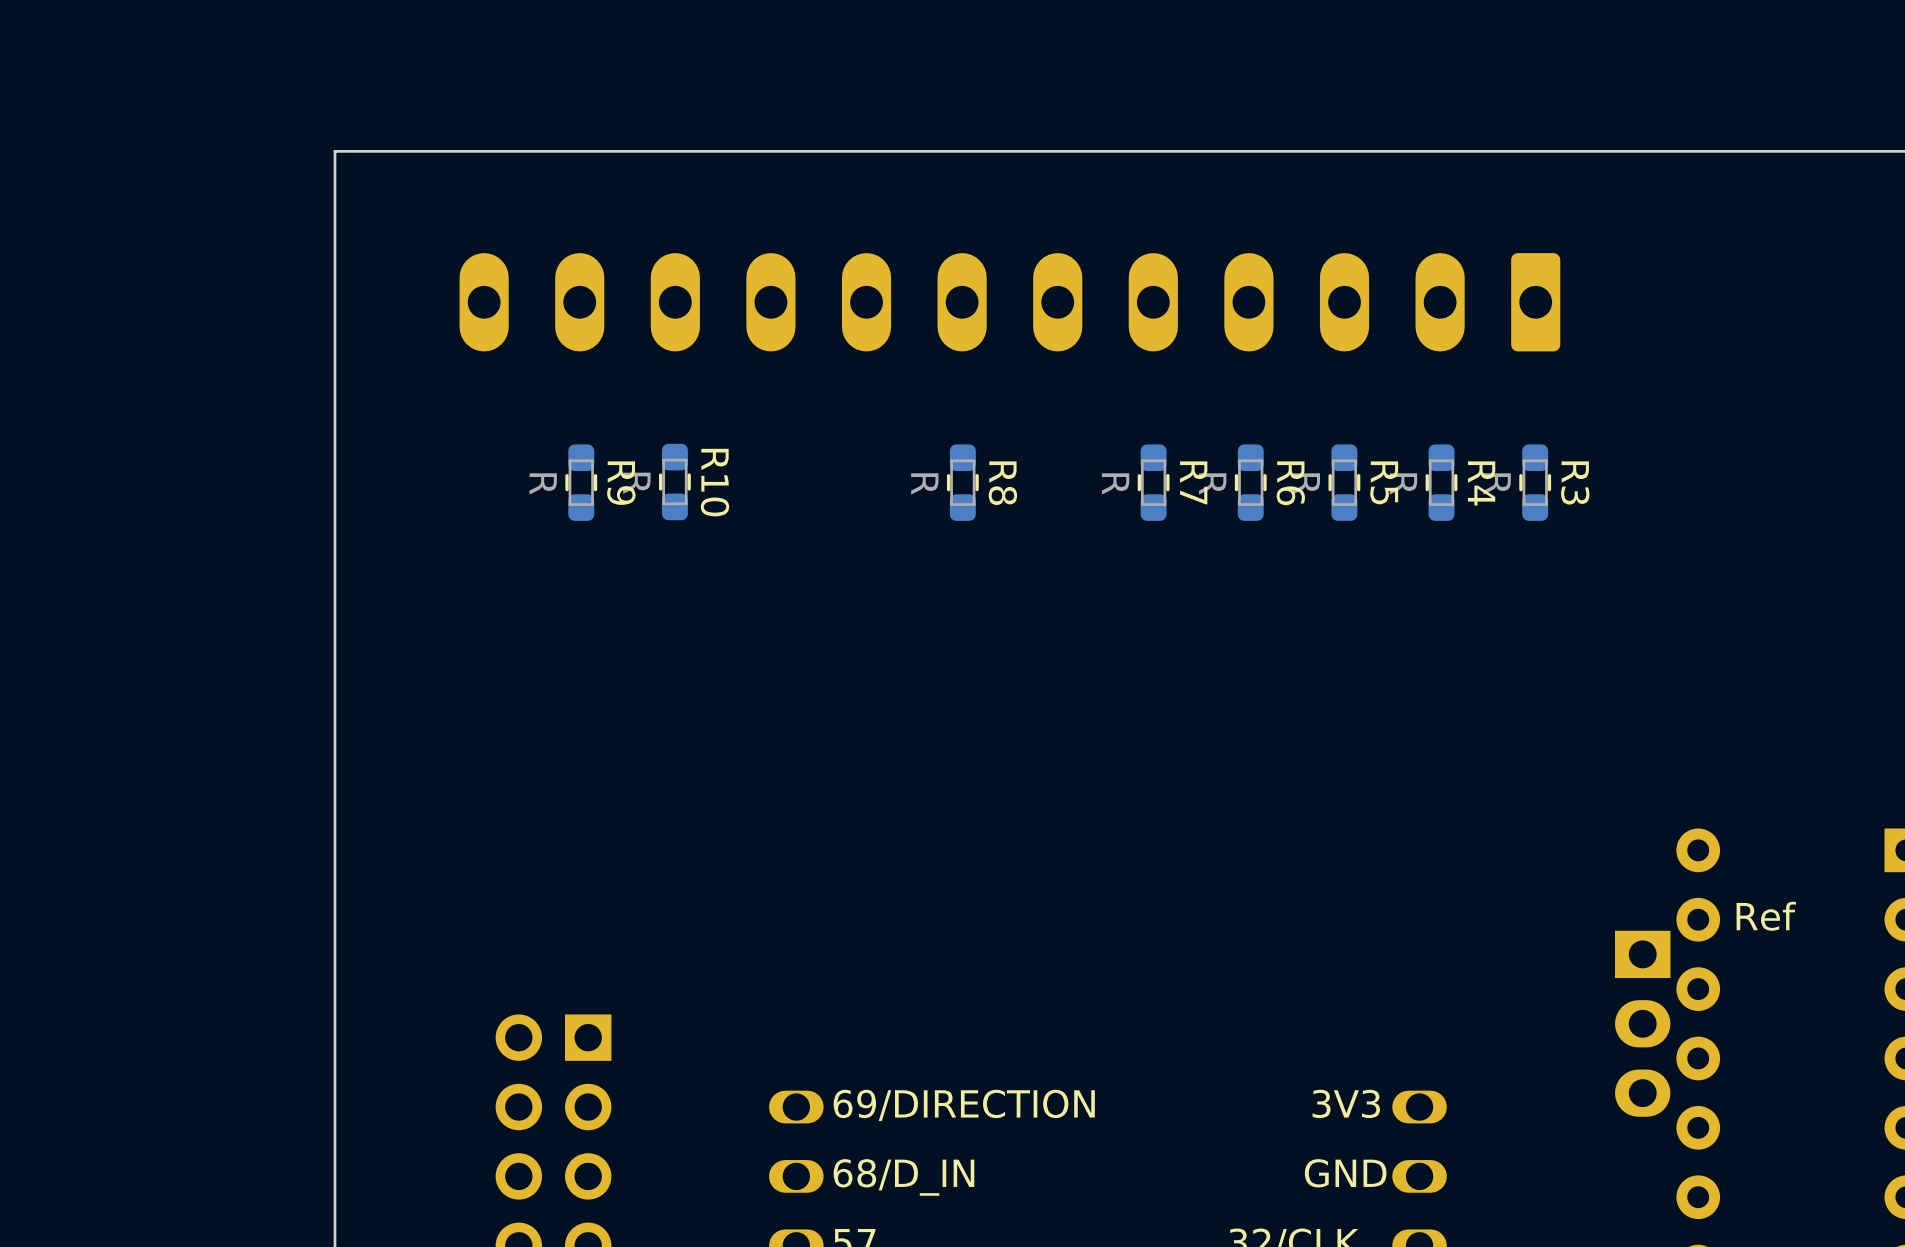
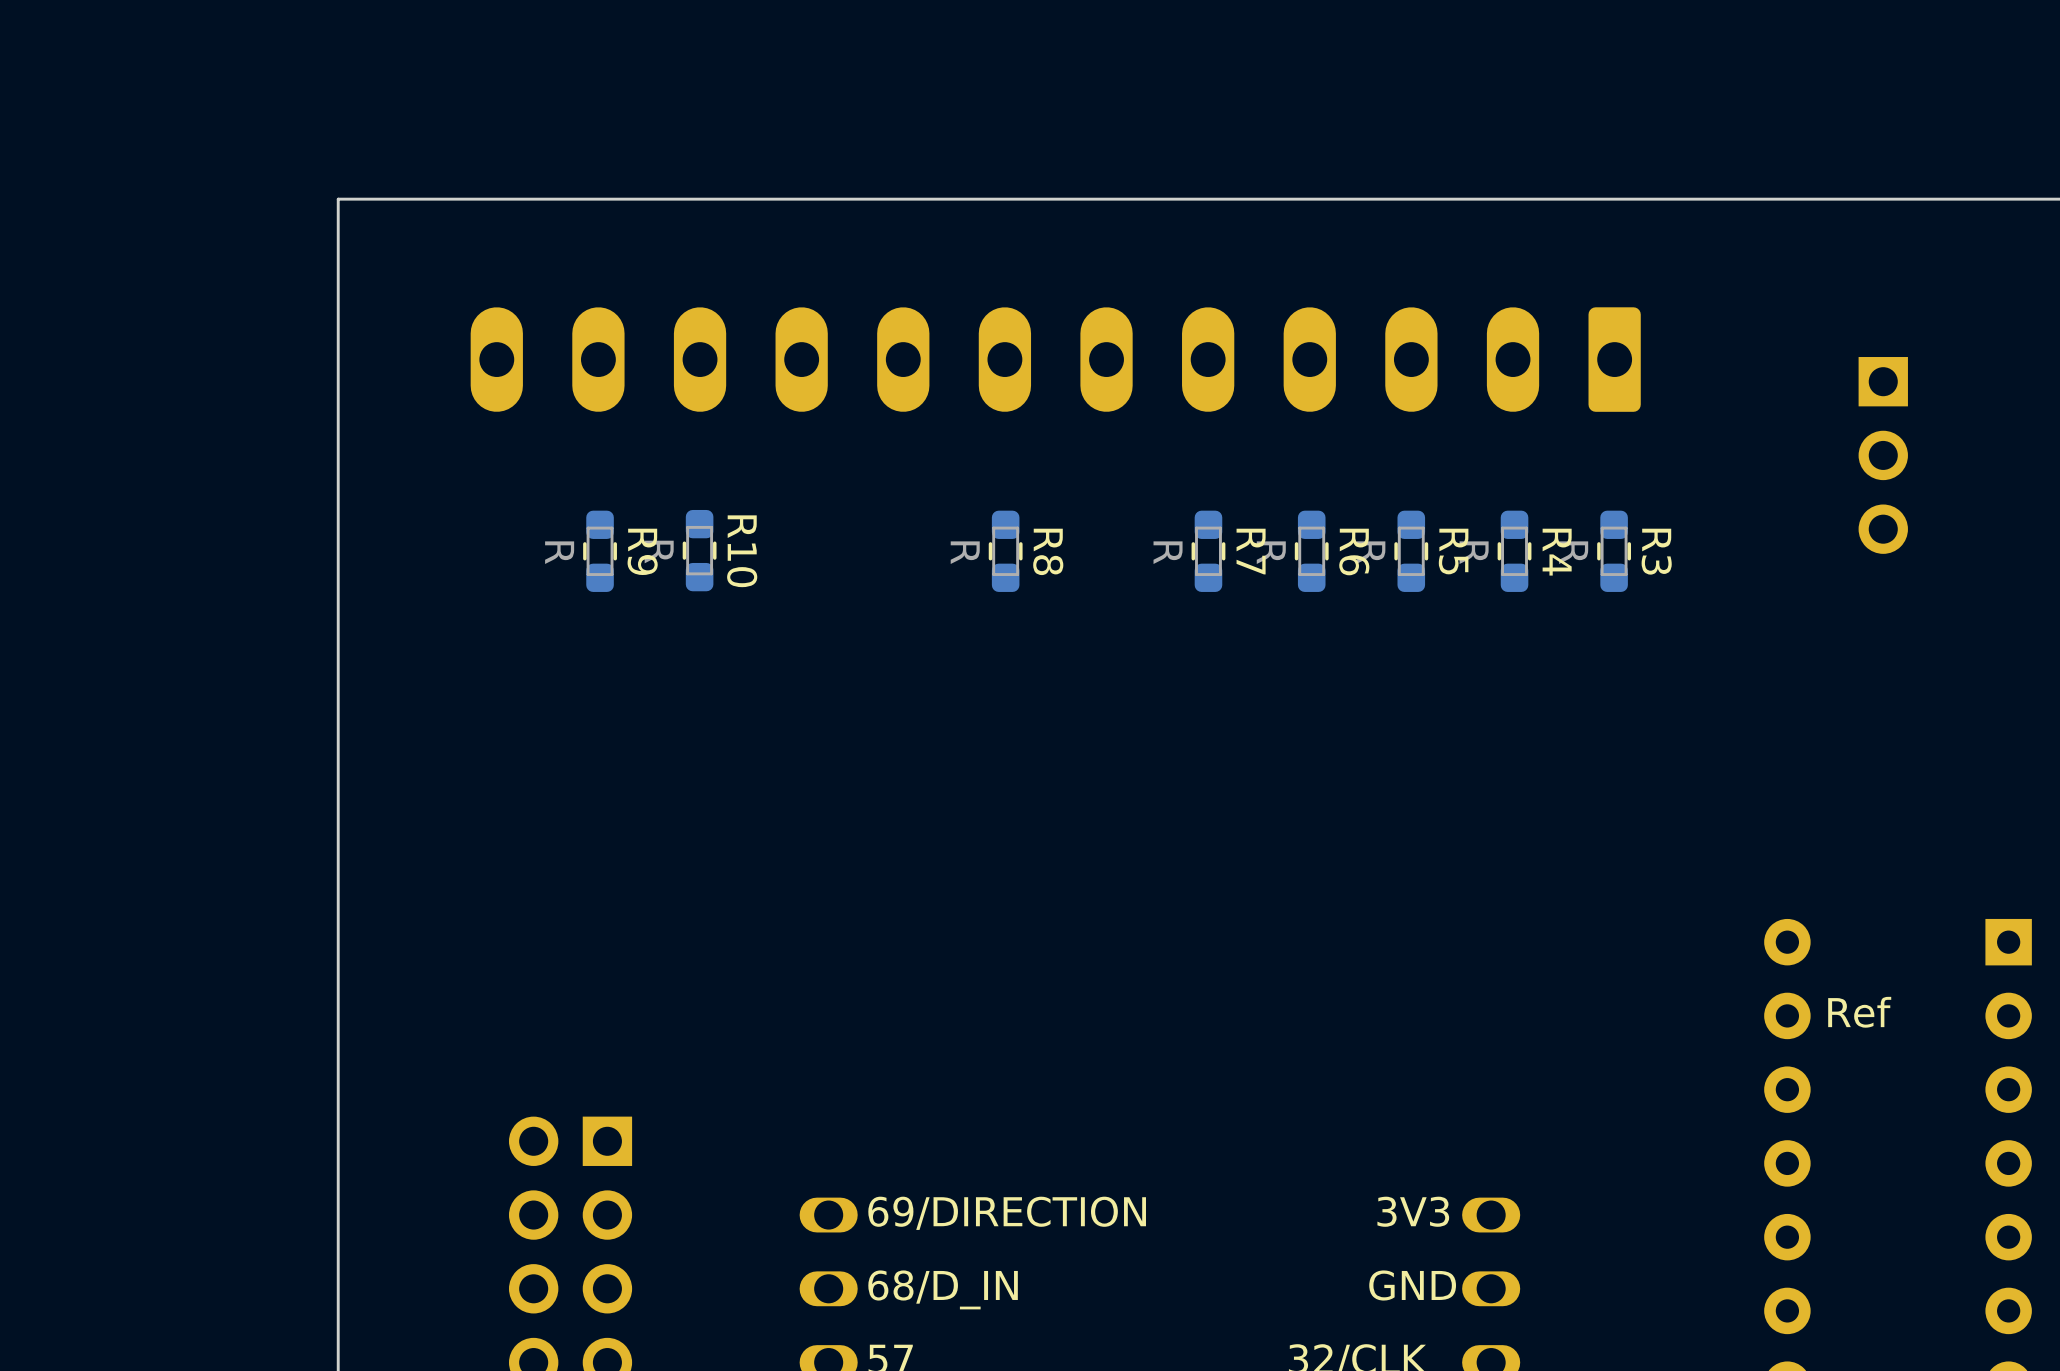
part: none -> (1883, 455)
part: (1642, 1023) -> none

